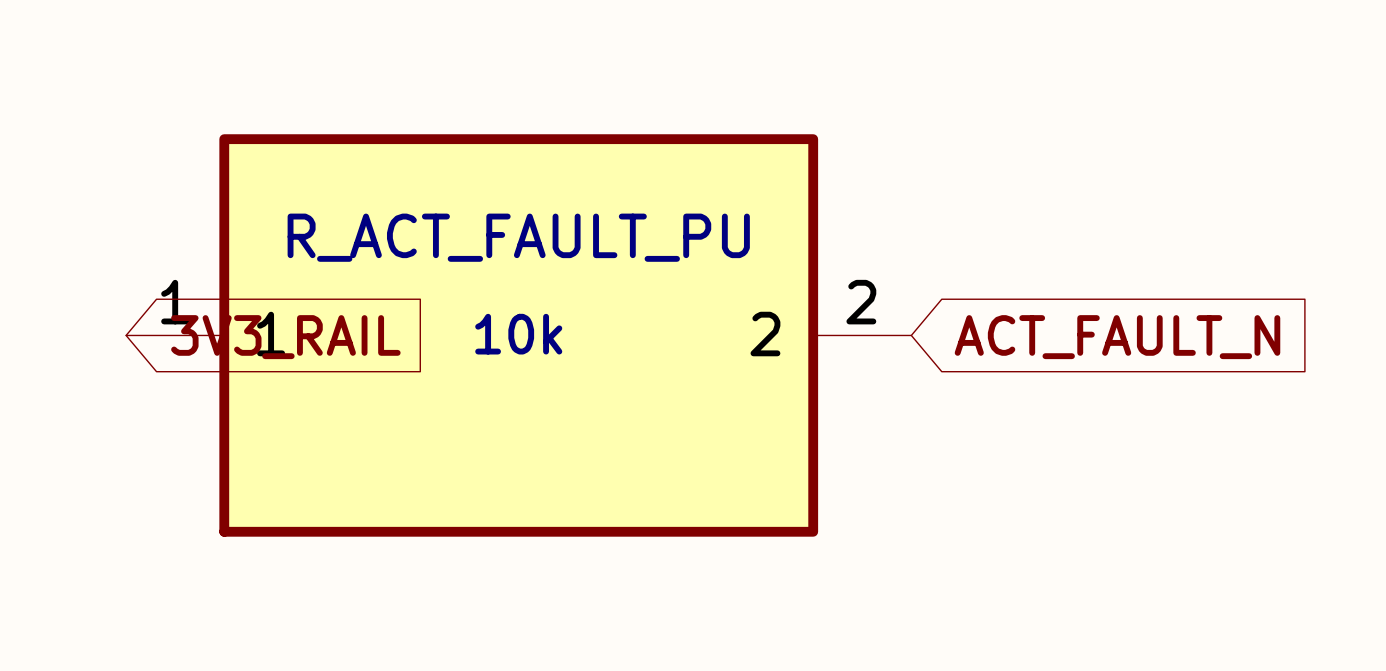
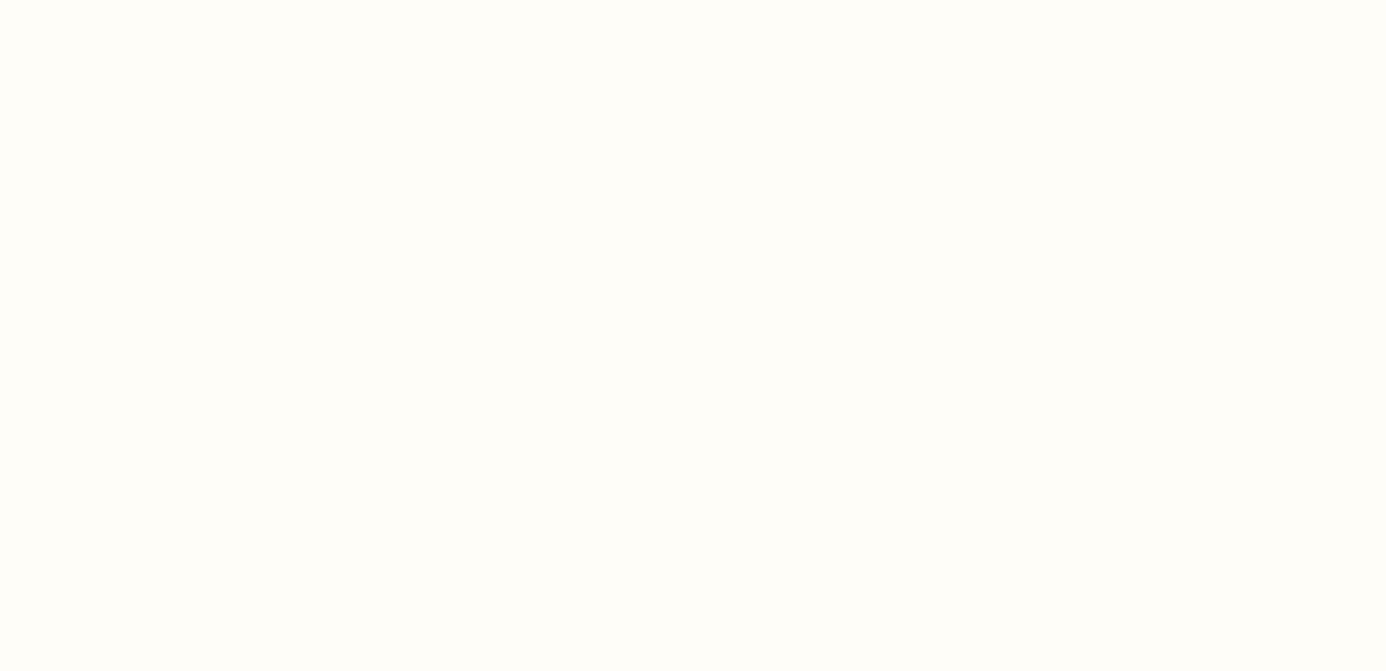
R_ACT_FAULT_PU: 10k (518, 335) -> none
global label: 3V3_RAIL (285, 337) -> none
global label: ACT_FAULT_N (1117, 337) -> none

